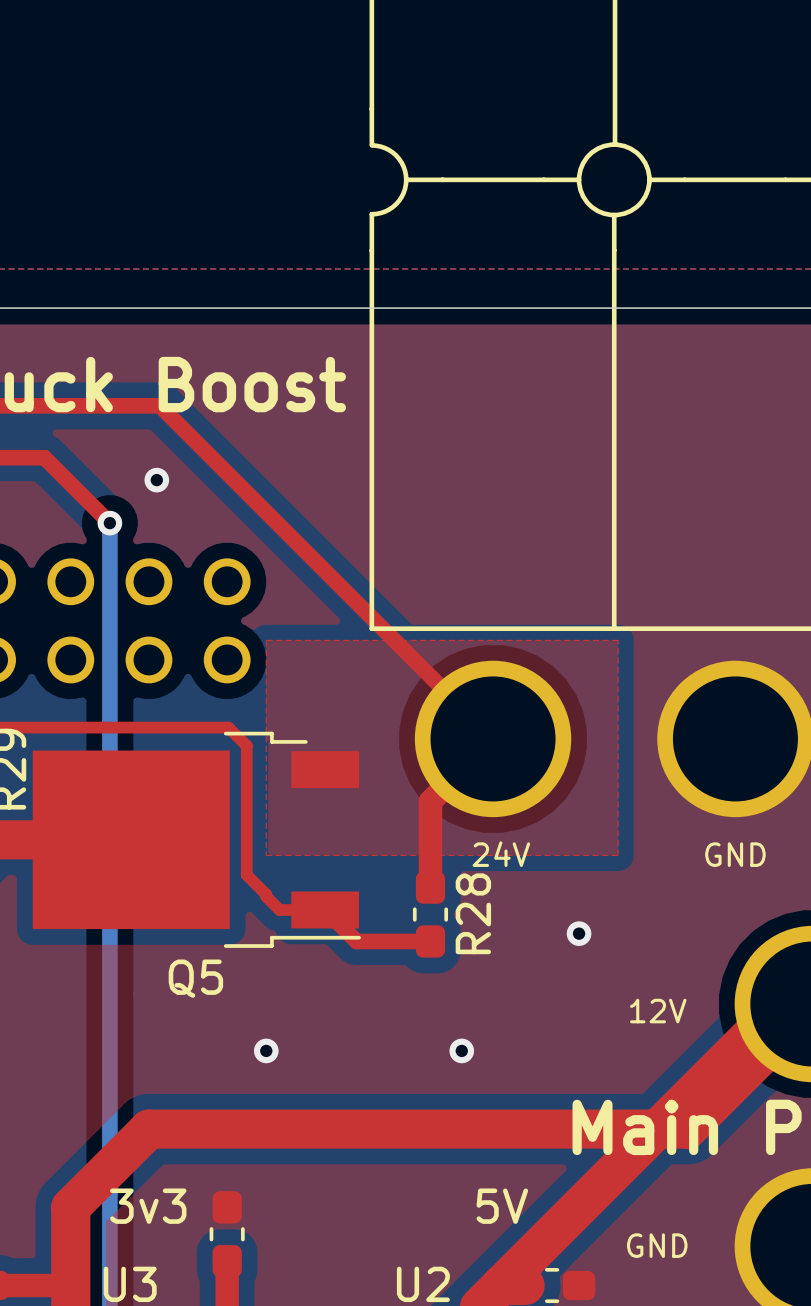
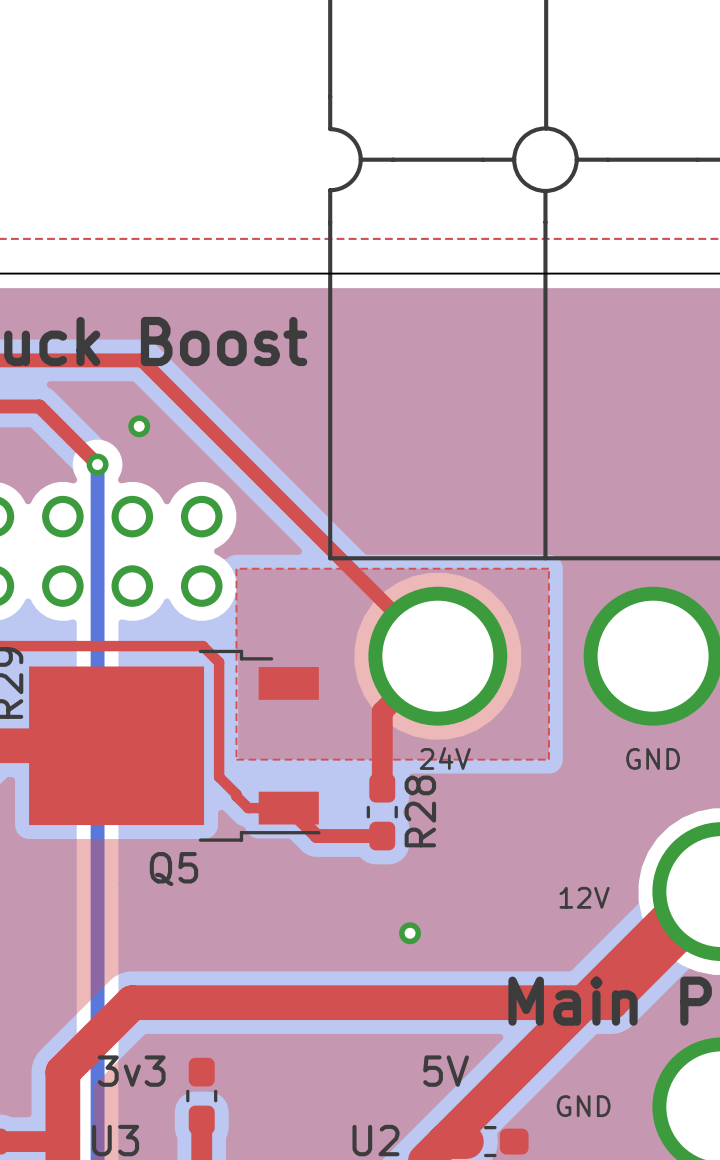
via: (579, 933) -> none
via: (266, 1050) -> none

